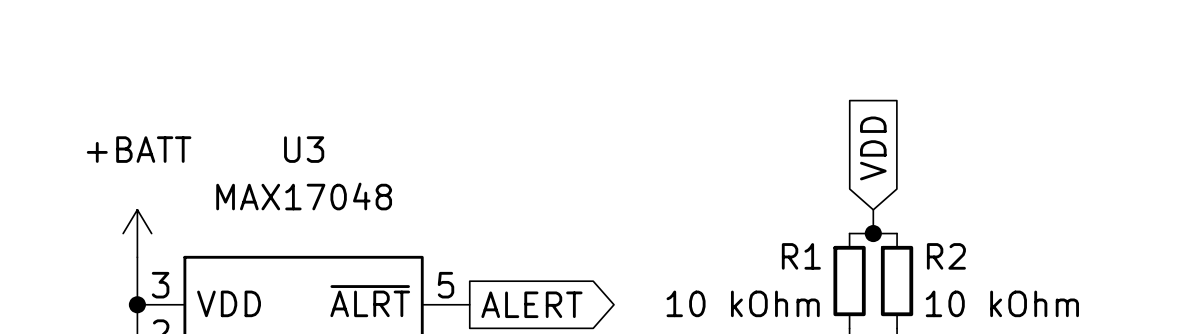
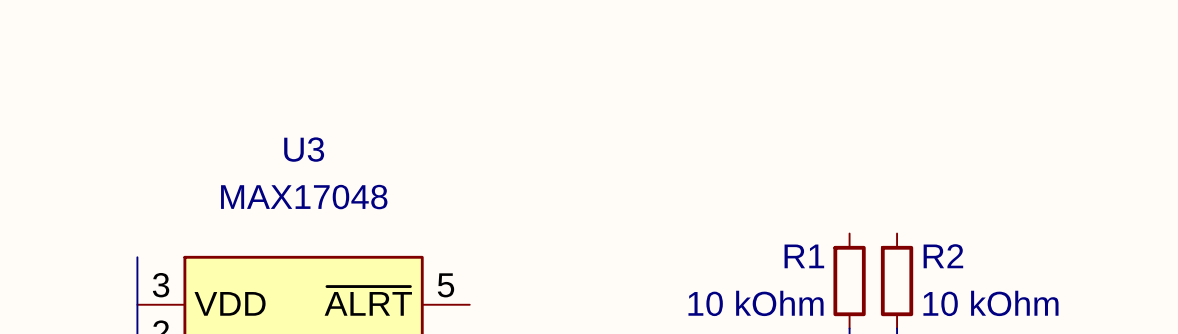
global label: VDD (873, 148) -> none
wire: (873, 209) (873, 233) -> none
power symbol: +BATT (137, 233) -> none
wire: (849, 233) (897, 233) -> none
junction: (873, 233) -> none
junction: (137, 304) -> none
global label: ALERT (531, 304) -> none

